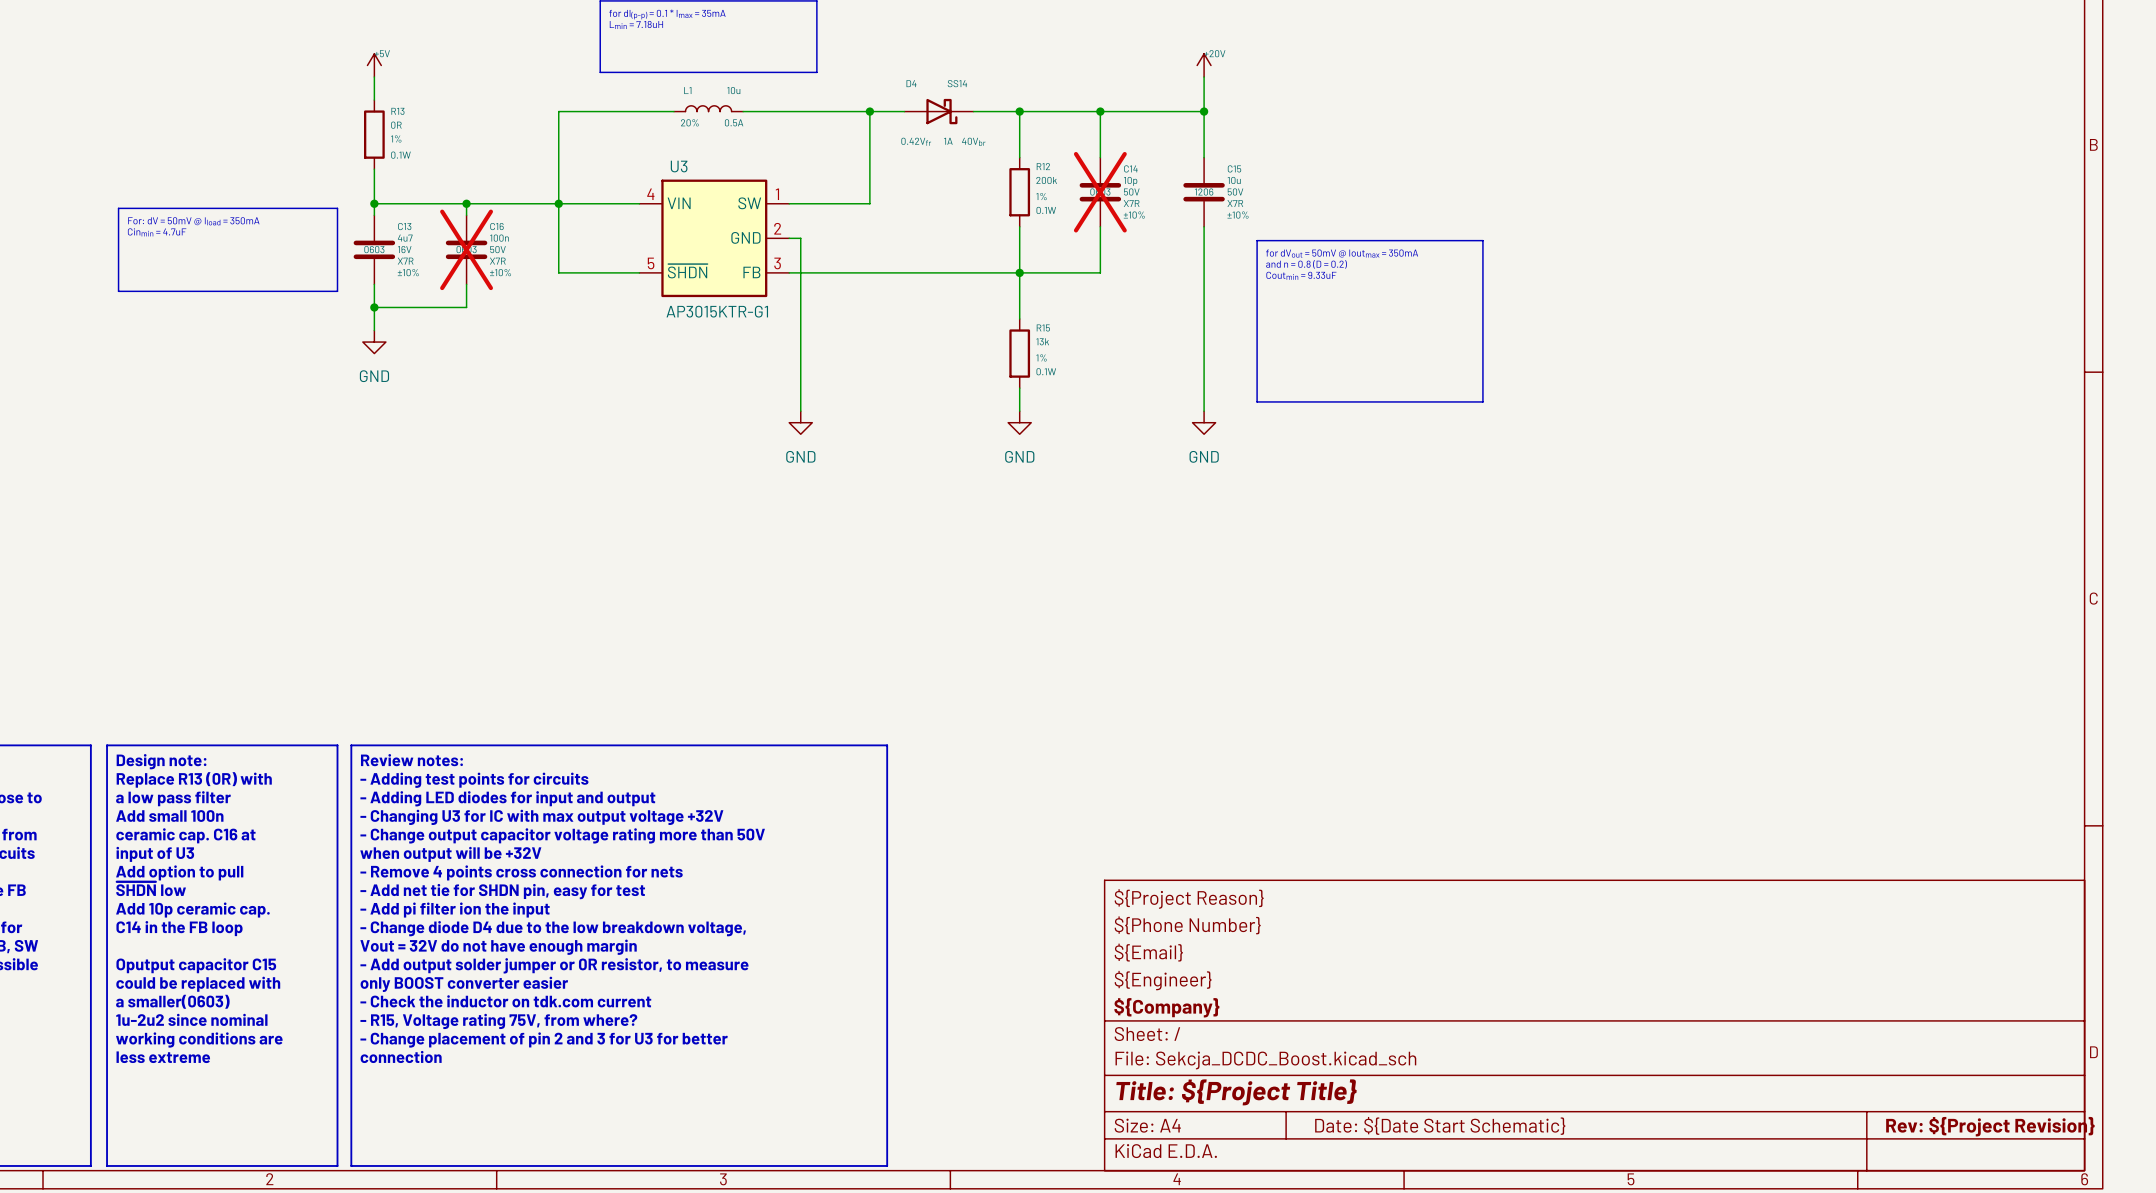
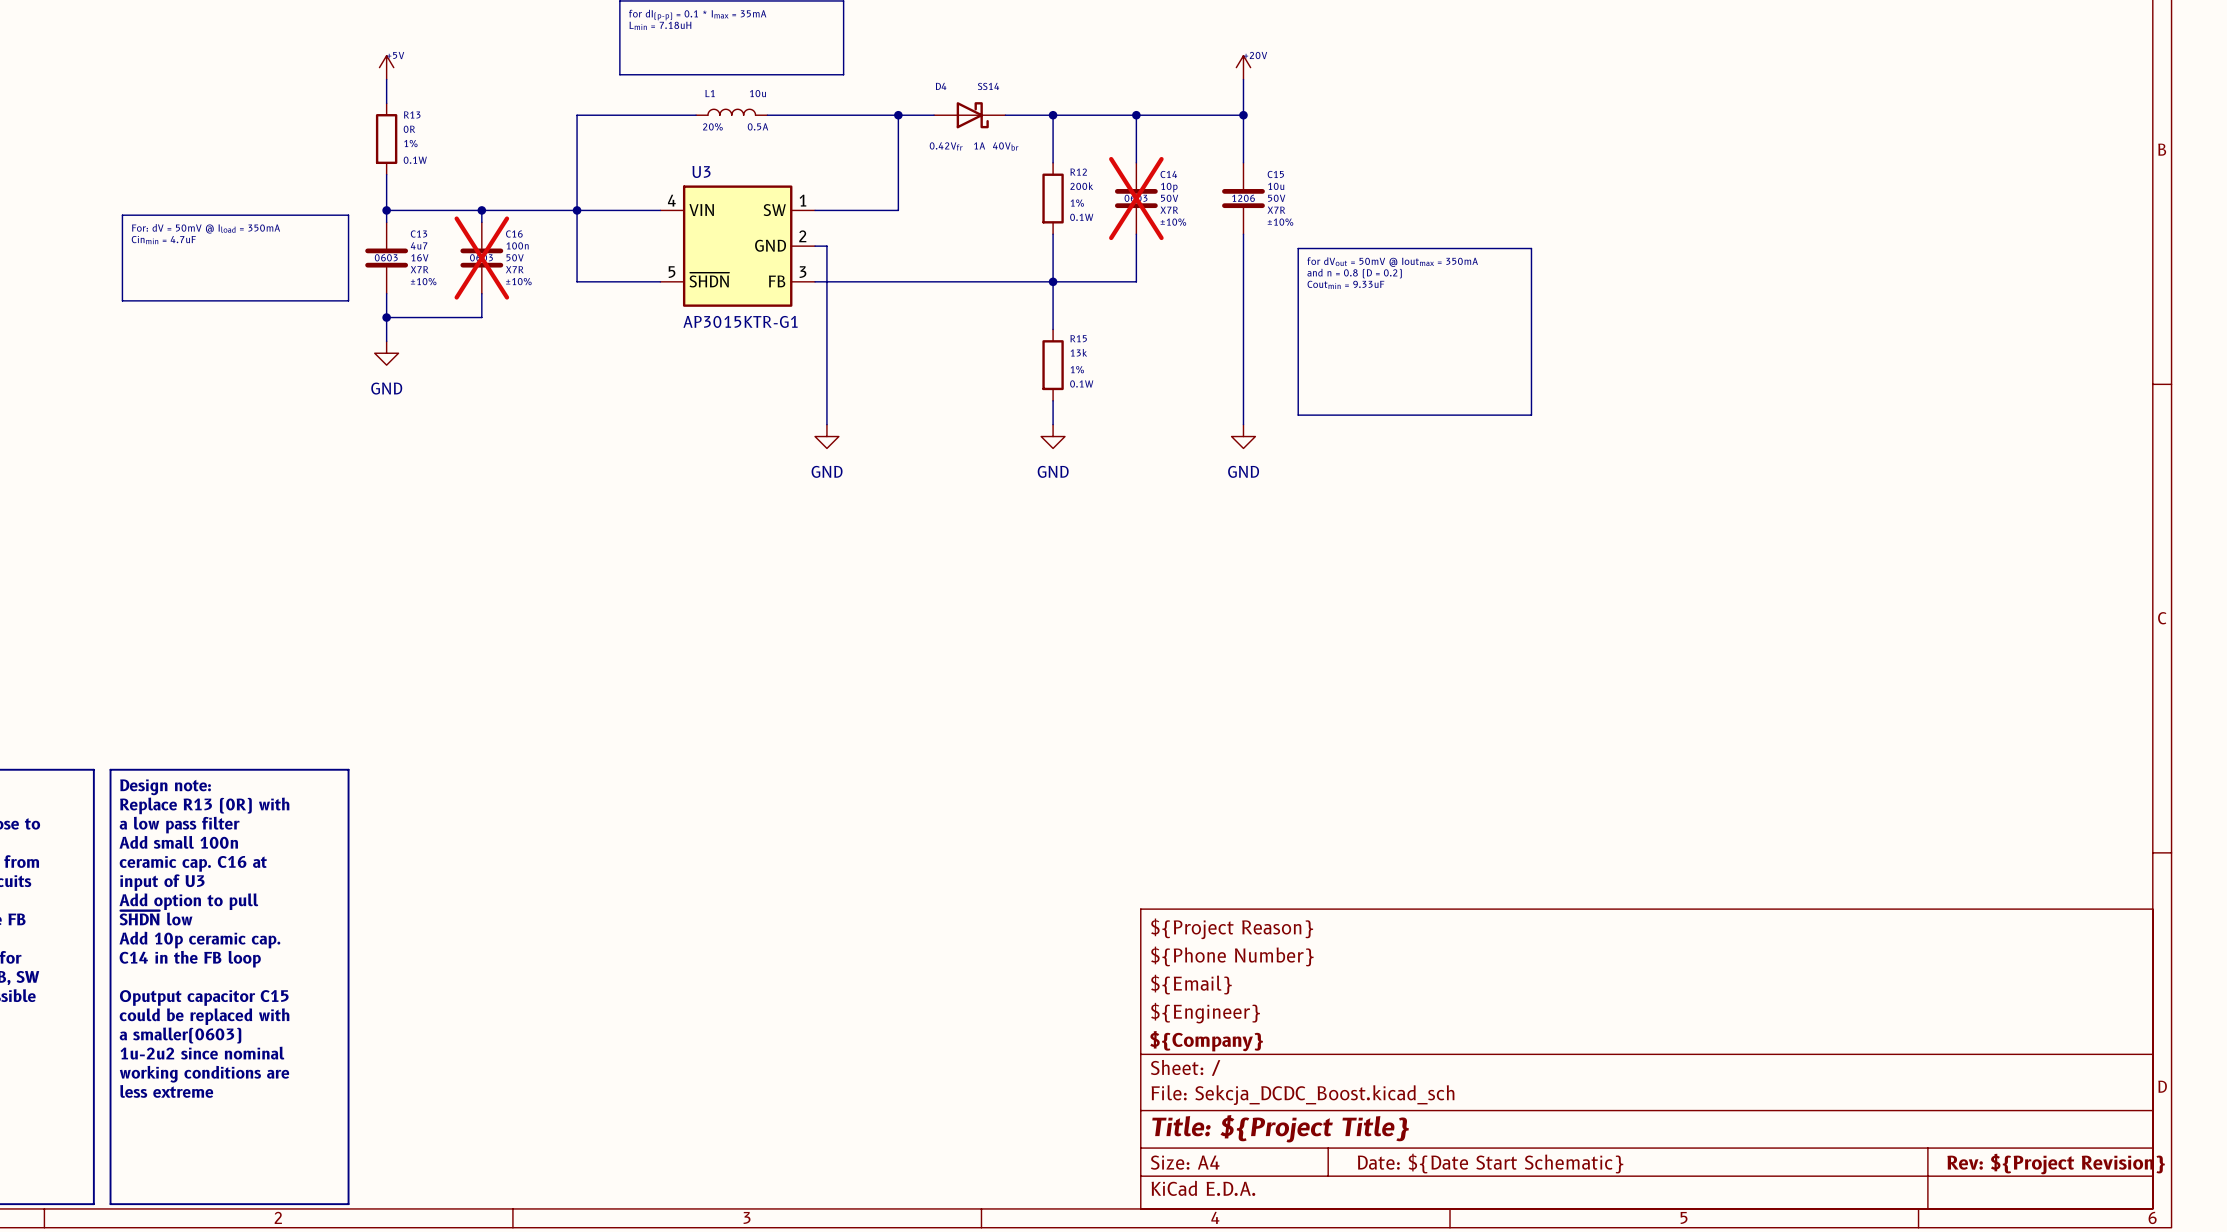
line: (351, 745) (887, 745) (887, 1165) (351, 1165) (351, 745) -> none
text: Review notes: (411, 760) -> none
text: - Adding test points for circuits (474, 780) -> none
text: - Adding LED diodes for input and output (507, 798) -> none
text: - Changing U3 for IC with max output voltage +32V (541, 817) -> none
text: - Change output capacitor voltage rating more than 50V (562, 835) -> none
text: when output will be +32V (450, 854) -> none
text: - Remove 4 points cross connection for nets (521, 872) -> none
text: - Add net tie for SHDN pin, easy for test (502, 891) -> none
text: - Add pi filter ion the input (455, 910) -> none
text: - Change diode D4 due to the low breakdown voltage, (553, 928) -> none
text: Vout = 32V do not have enough margin (498, 947) -> none
text: - Add output solder jumper or 0R resistor, to measure (554, 965) -> none
text: only BOOST converter easier (464, 984) -> none
text: - Check the inductor on tdk.com current (505, 1001) -> none
text: - R15, Voltage rating 75V, from where? (498, 1021) -> none
text: - Change placement of pin 2 and 3 for U3 for better (544, 1039) -> none
text: connection (401, 1056) -> none

